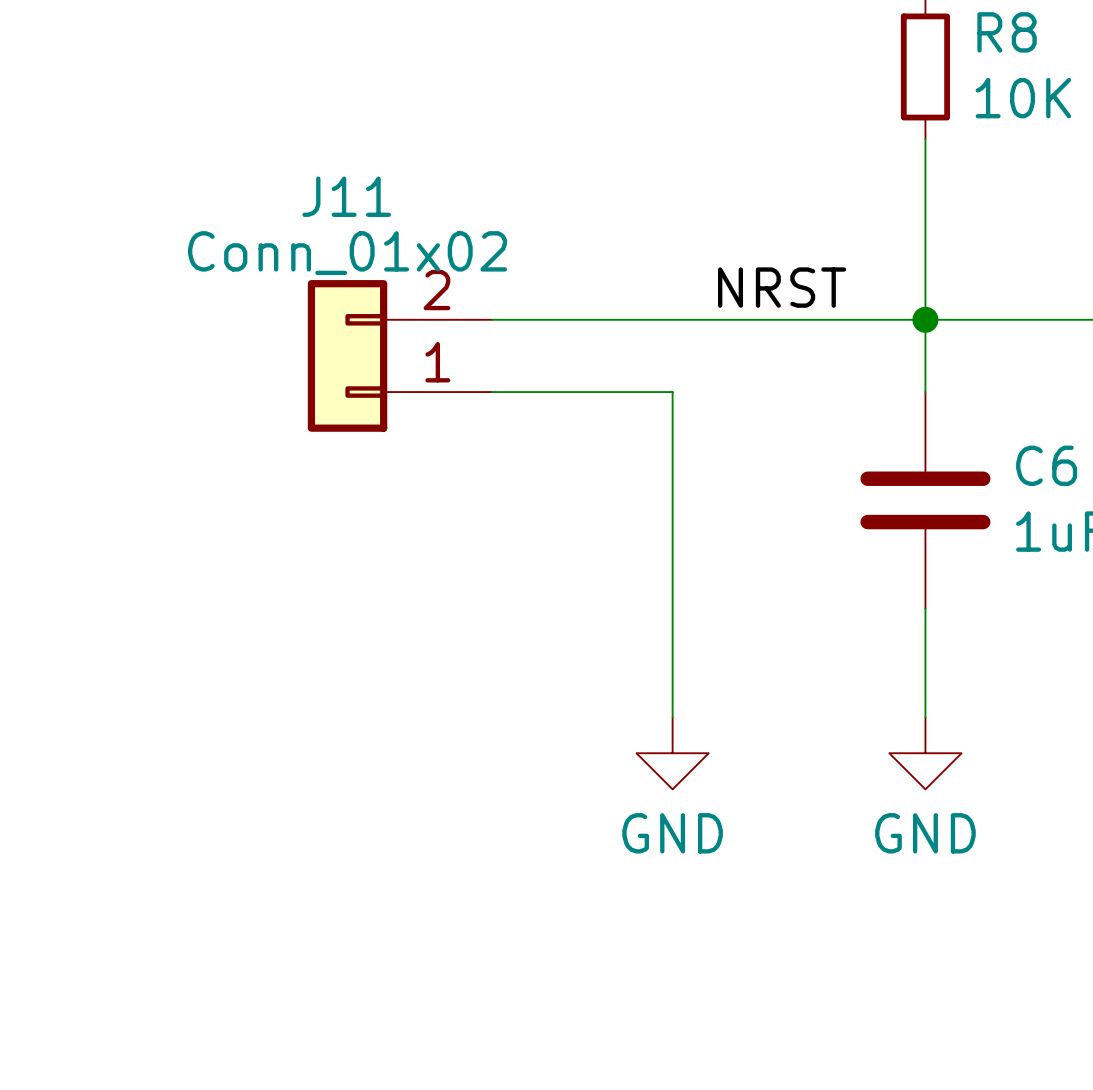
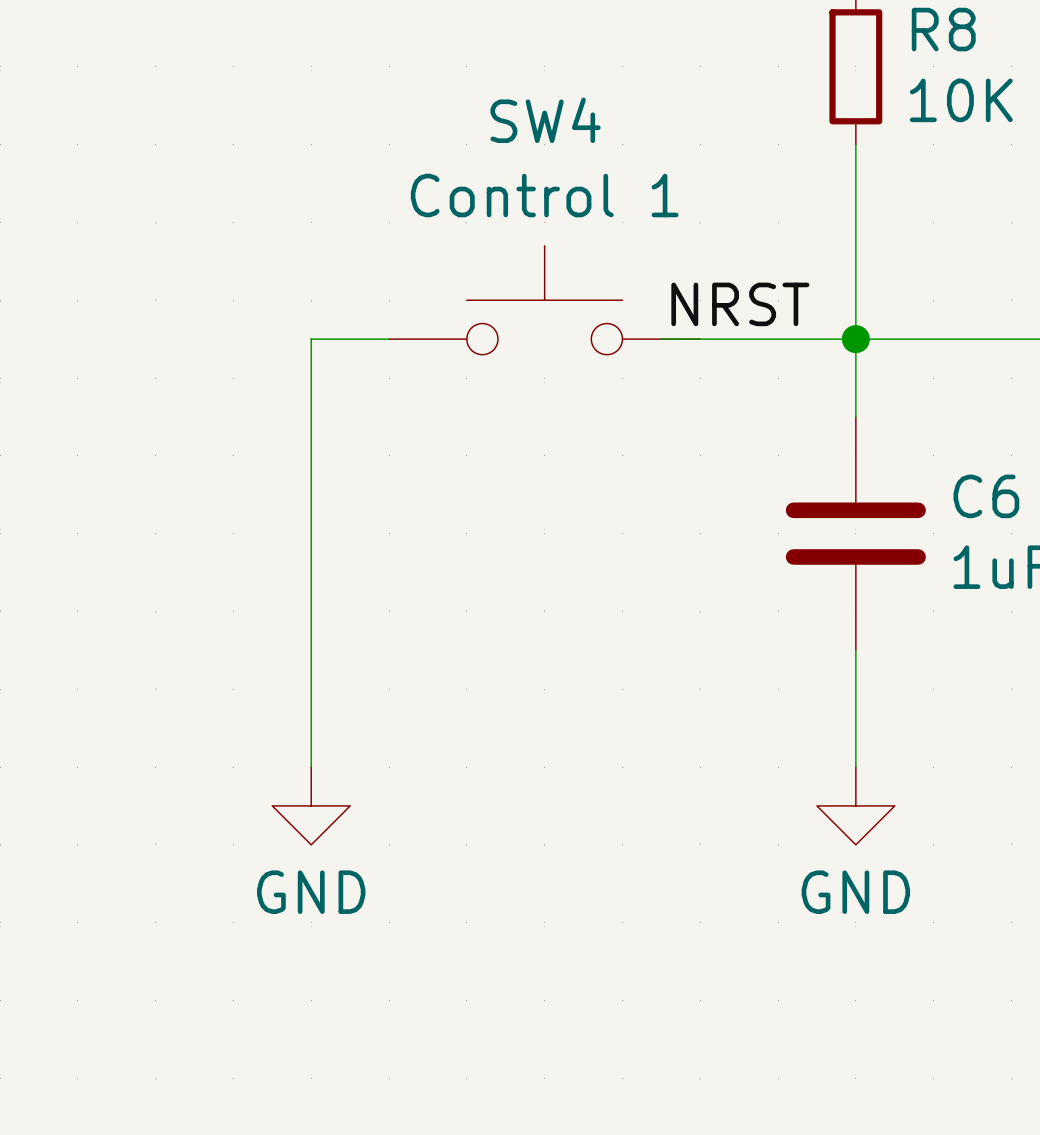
SW4: none -> Control 1 (544, 300)
label position: NRST (782, 287) -> NRST (740, 304)
wire: (492, 319) (744, 319) -> (389, 339) (311, 339) (311, 767)
J11: Conn_01x02 (399, 355) -> none
wire: (492, 392) (672, 392) (672, 717) -> none
power symbol position: GND (672, 753) -> GND (311, 805)

